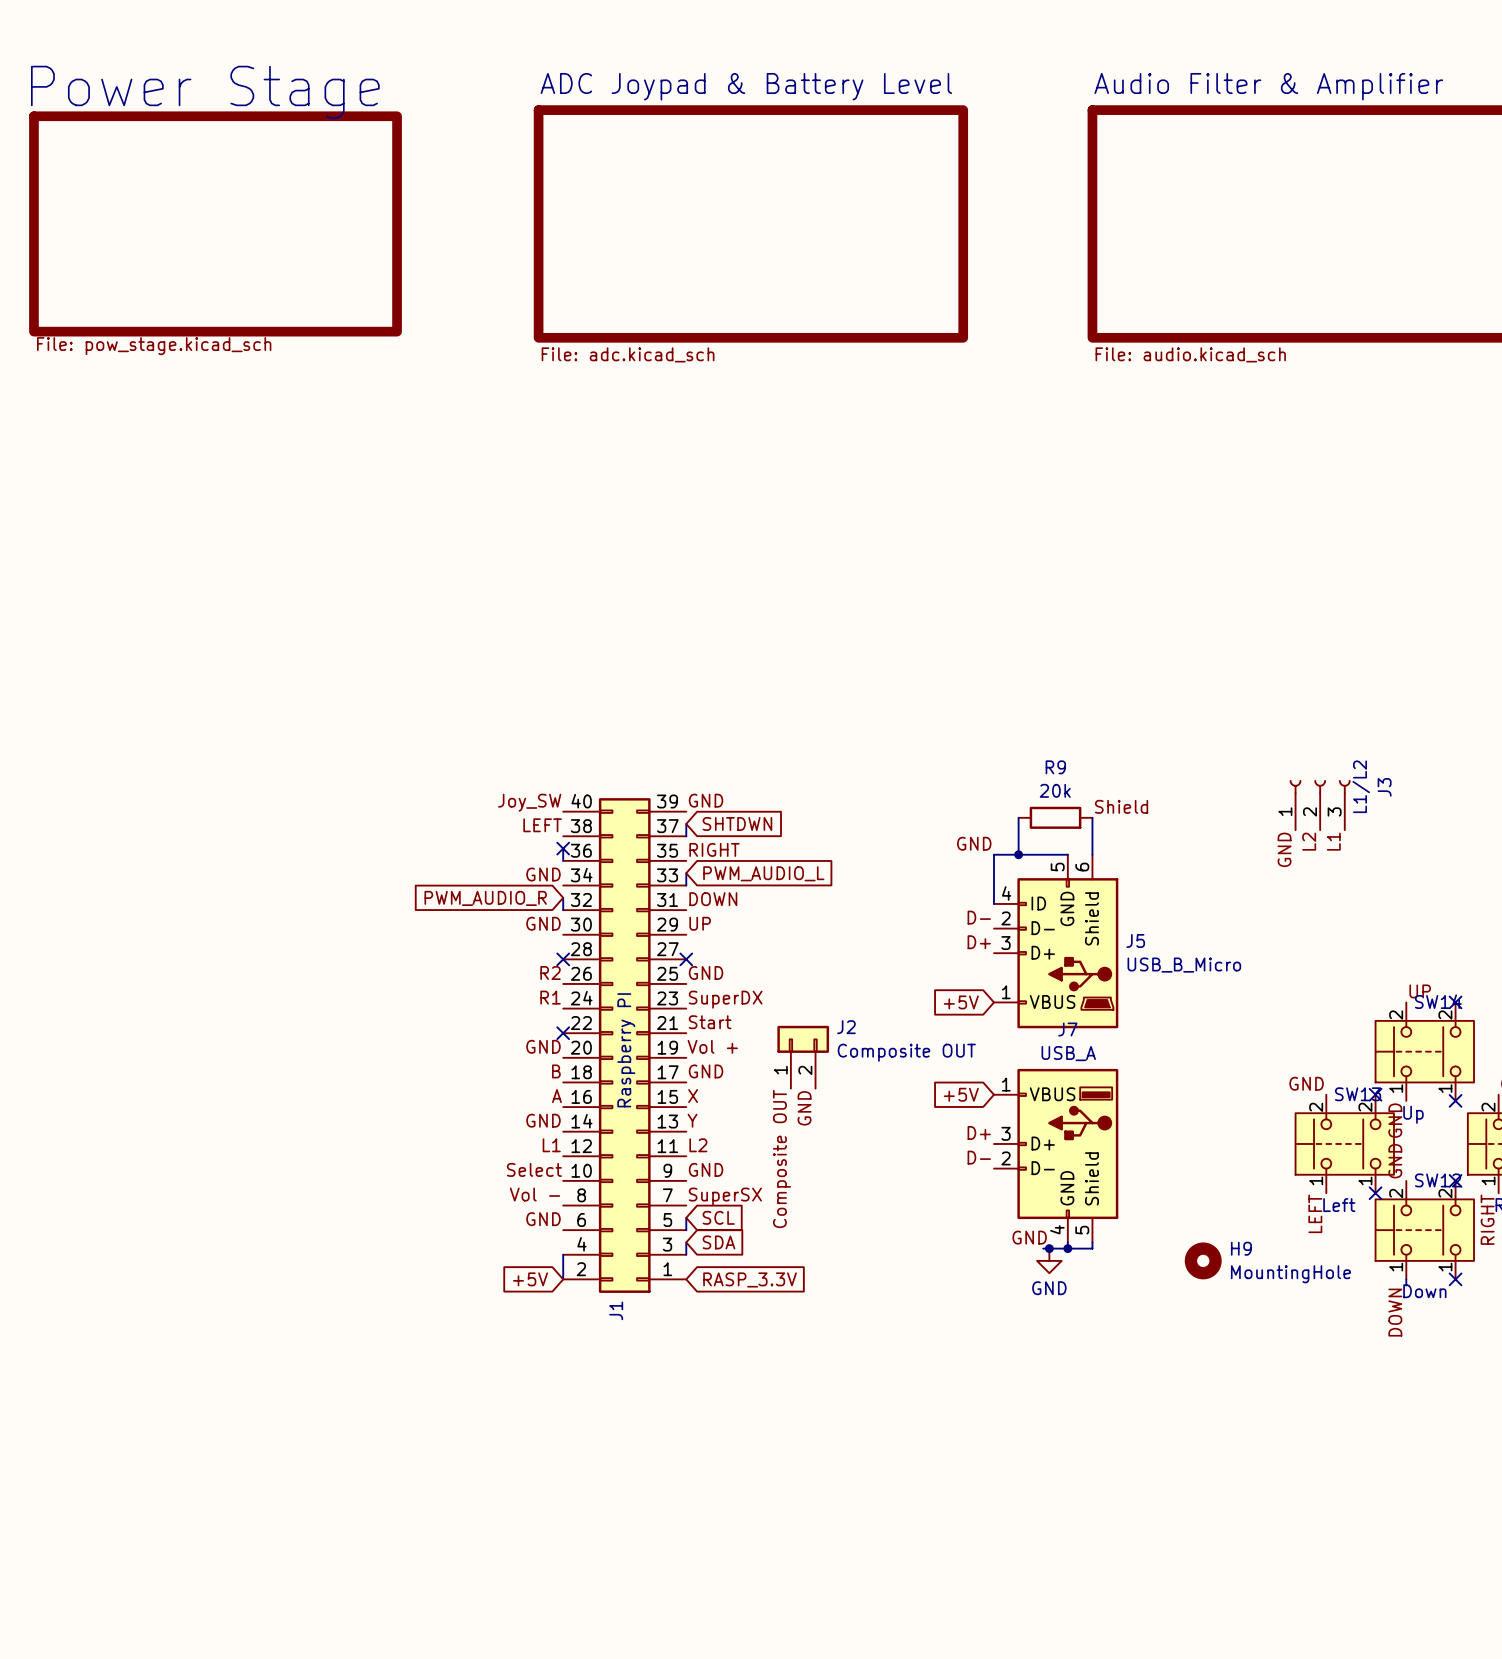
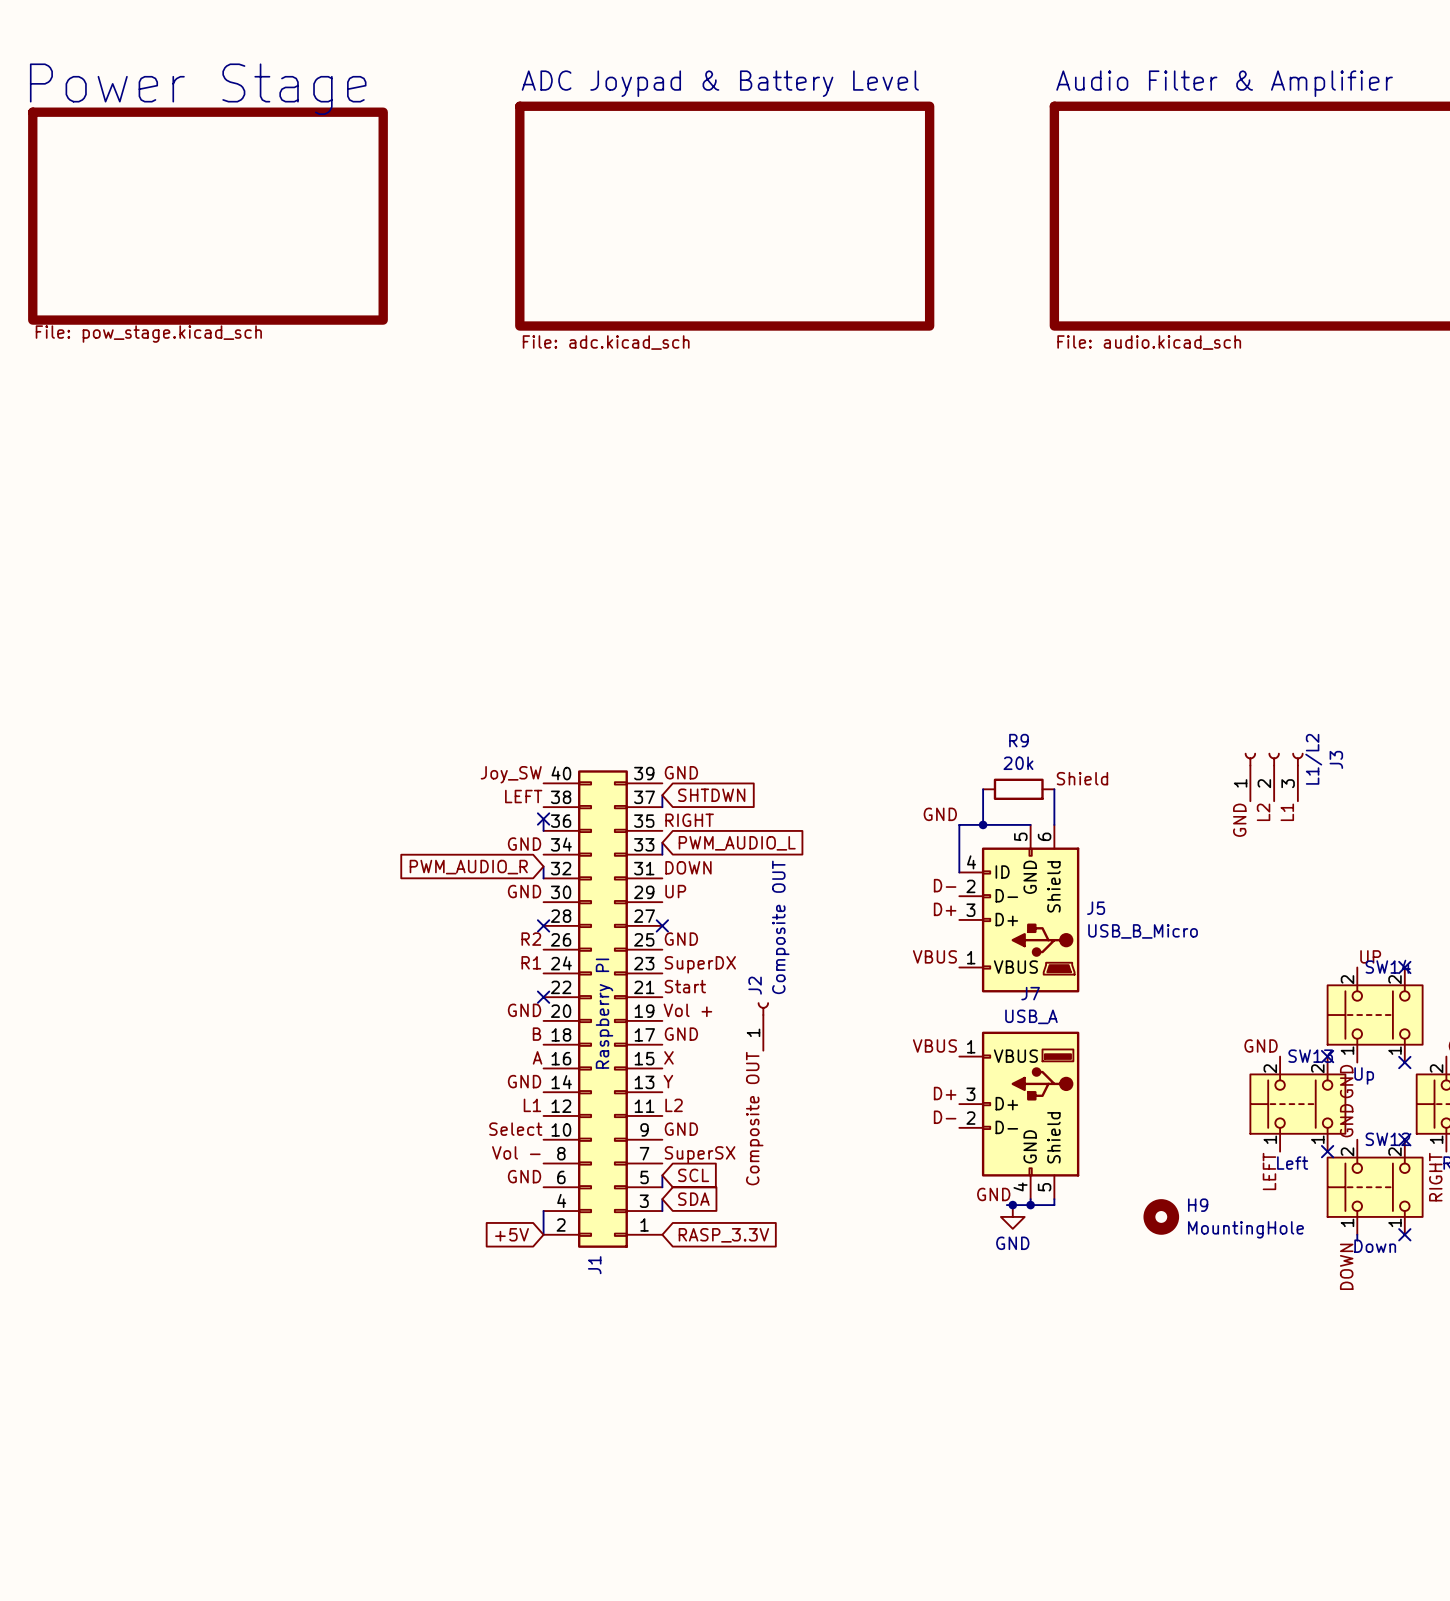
label: none -> VBUS (934, 956)
global label: +5V (961, 1002) -> none
J2 symbol: [777, 1025, 830, 1089] -> [757, 1002, 769, 1051]
J2 name position: J2 (846, 1027) -> J2 (755, 985)
J2 value position: Composite OUT (906, 1052) -> Composite OUT (780, 927)
label: none -> VBUS (934, 1045)
global label: +5V (961, 1094) -> none
label: GND (804, 1108) -> none

